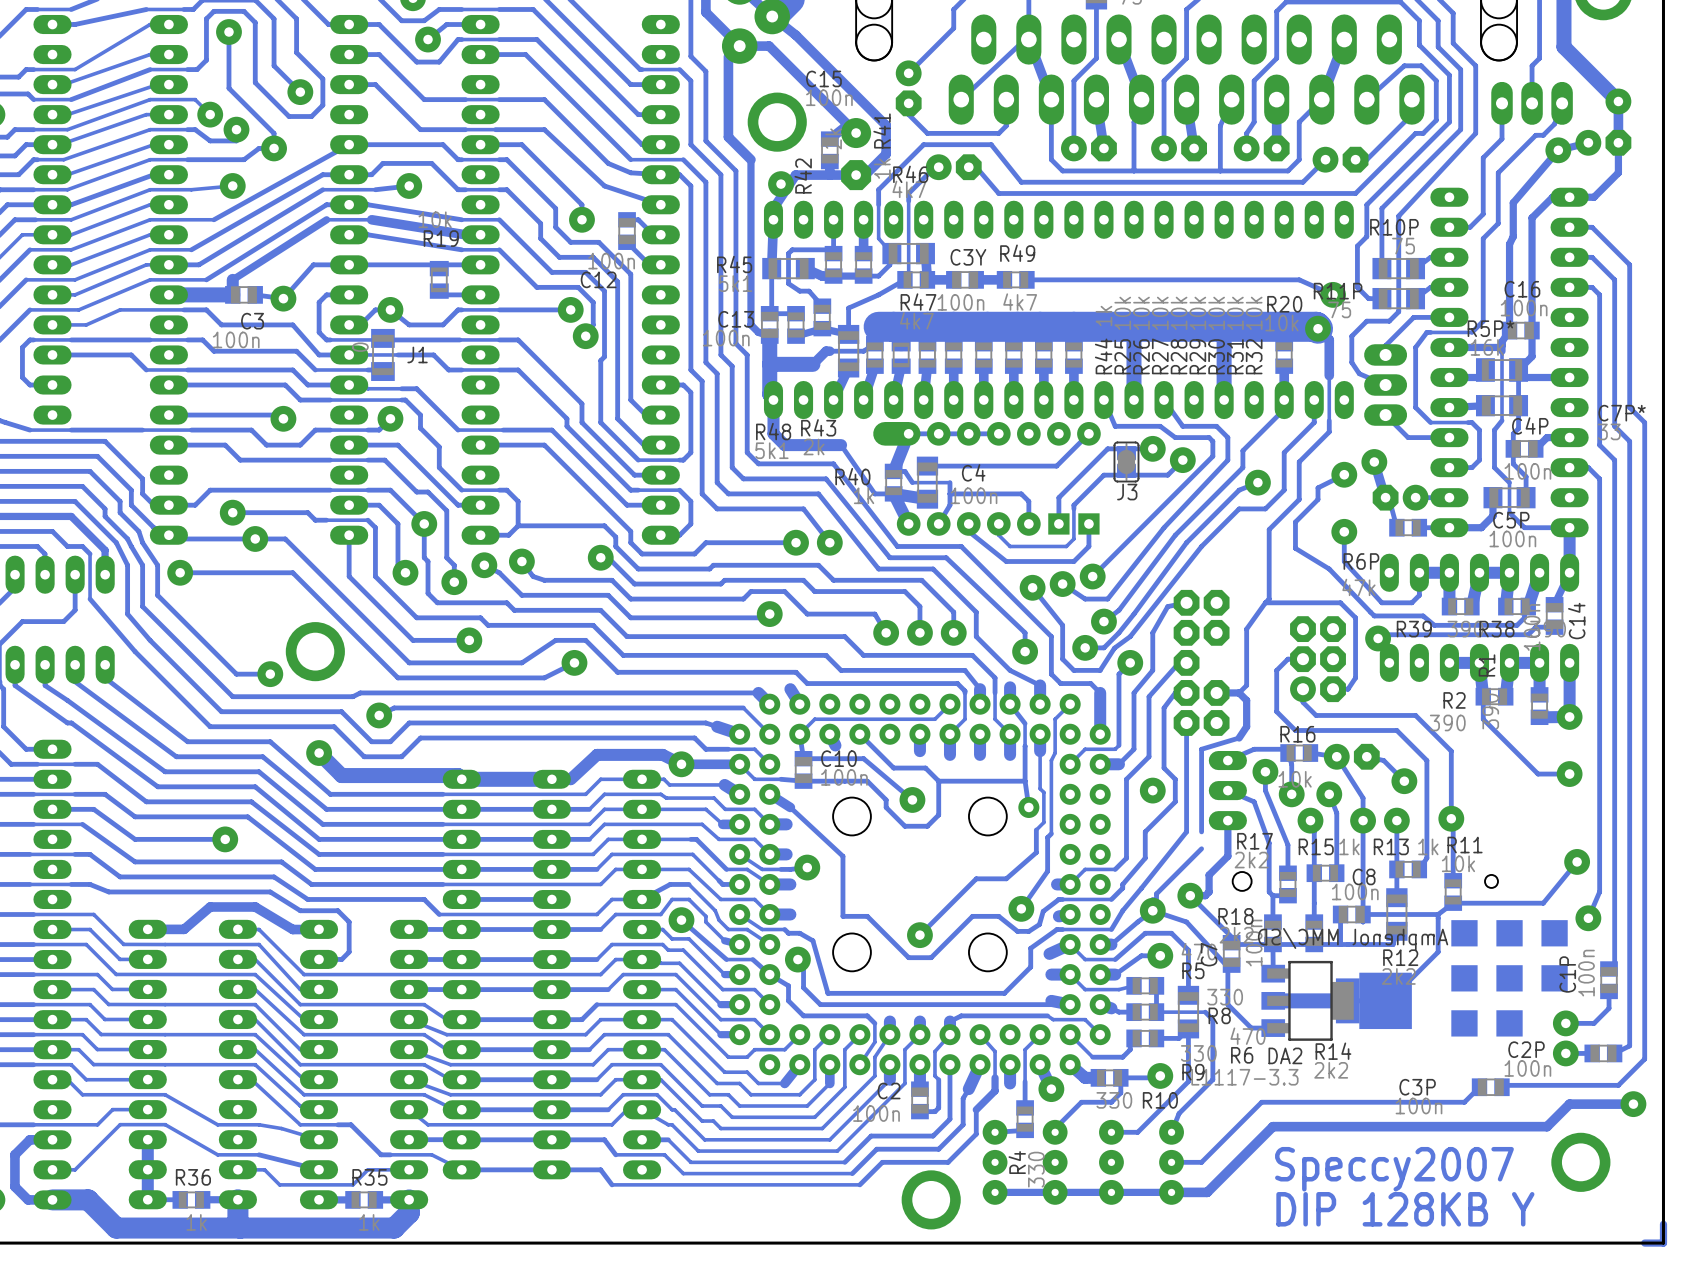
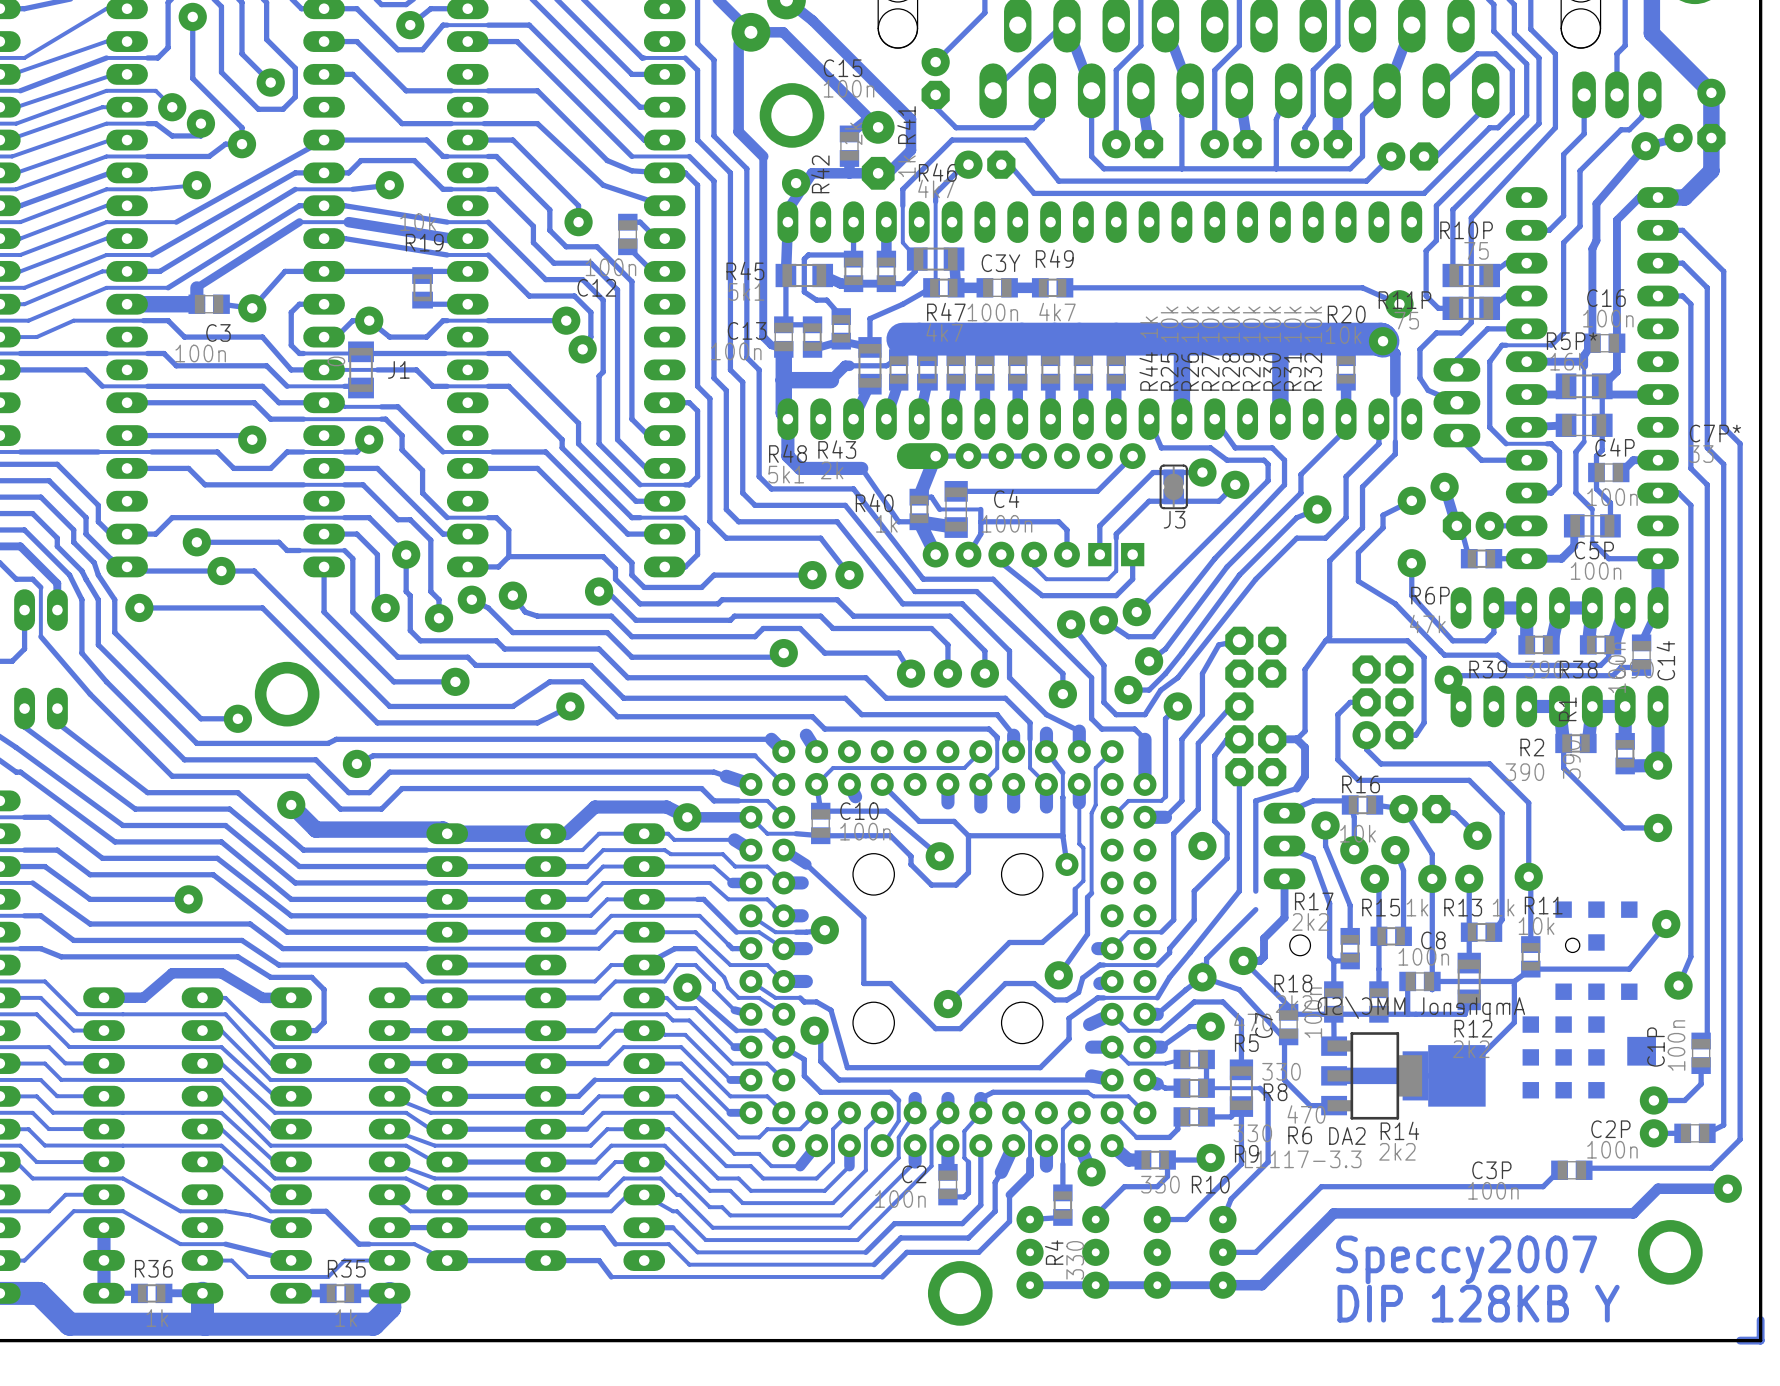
track width: thin (1618, 101) (1618, 172) (1594, 197) (1569, 197) -> thick (1711, 92) (1711, 170) (1684, 197) (1658, 197)
drawing: none -> [1555, 901, 1572, 918]
drawing: none -> [1588, 901, 1605, 918]
drawing: none -> [1621, 901, 1638, 918]
drawing: none -> [1588, 934, 1605, 951]
drawing: none -> [1555, 983, 1572, 1000]
drawing: none -> [1621, 983, 1638, 1000]
drawing: [1451, 920, 1478, 947] -> none
drawing shape: [1496, 920, 1523, 947] -> [1588, 983, 1605, 1000]
drawing: [1541, 920, 1568, 947] -> none
drawing: none -> [1522, 1016, 1540, 1033]
drawing: none -> [1555, 1016, 1572, 1033]
drawing: none -> [1588, 1016, 1605, 1033]
drawing: [1451, 965, 1478, 992] -> none
drawing shape: [1496, 965, 1523, 992] -> [1588, 1049, 1605, 1066]
drawing: none -> [1522, 1049, 1540, 1066]
drawing: none -> [1555, 1049, 1572, 1066]
drawing: none -> [1522, 1082, 1540, 1099]
drawing: none -> [1555, 1082, 1572, 1099]
drawing: [1451, 1010, 1478, 1037] -> none
drawing shape: [1496, 1010, 1523, 1037] -> [1588, 1082, 1605, 1099]

